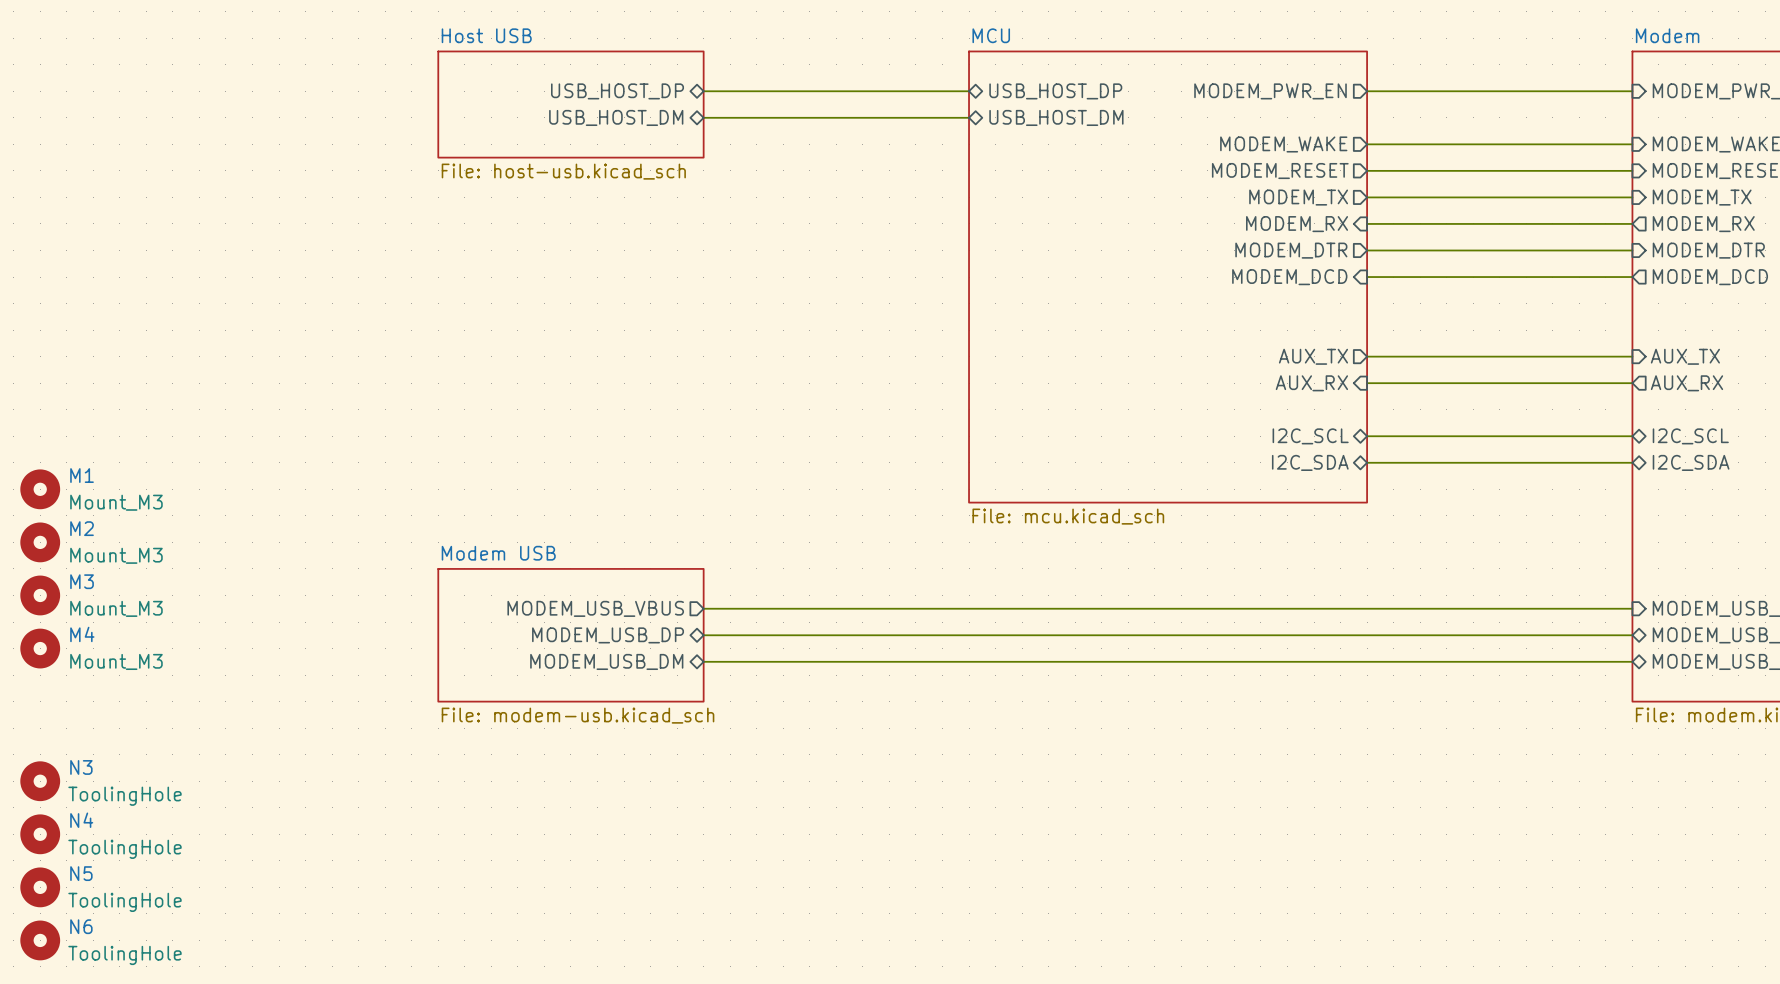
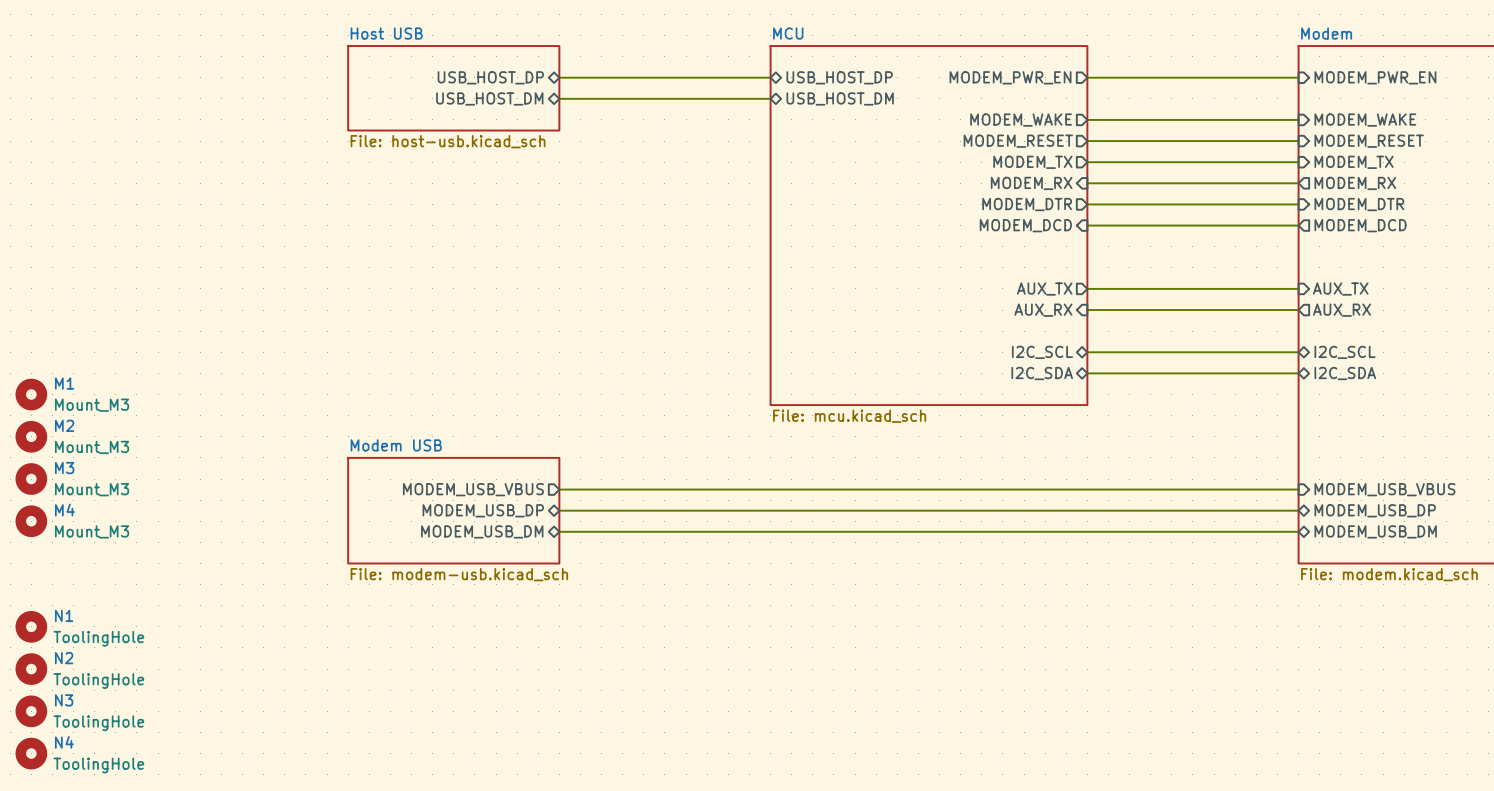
N3 name: N3 (81, 767) -> N1 (64, 615)
N4 name: N4 (81, 820) -> N2 (64, 658)
N5 name: N5 (81, 873) -> N3 (64, 700)
N6 name: N6 (81, 926) -> N4 (64, 742)

